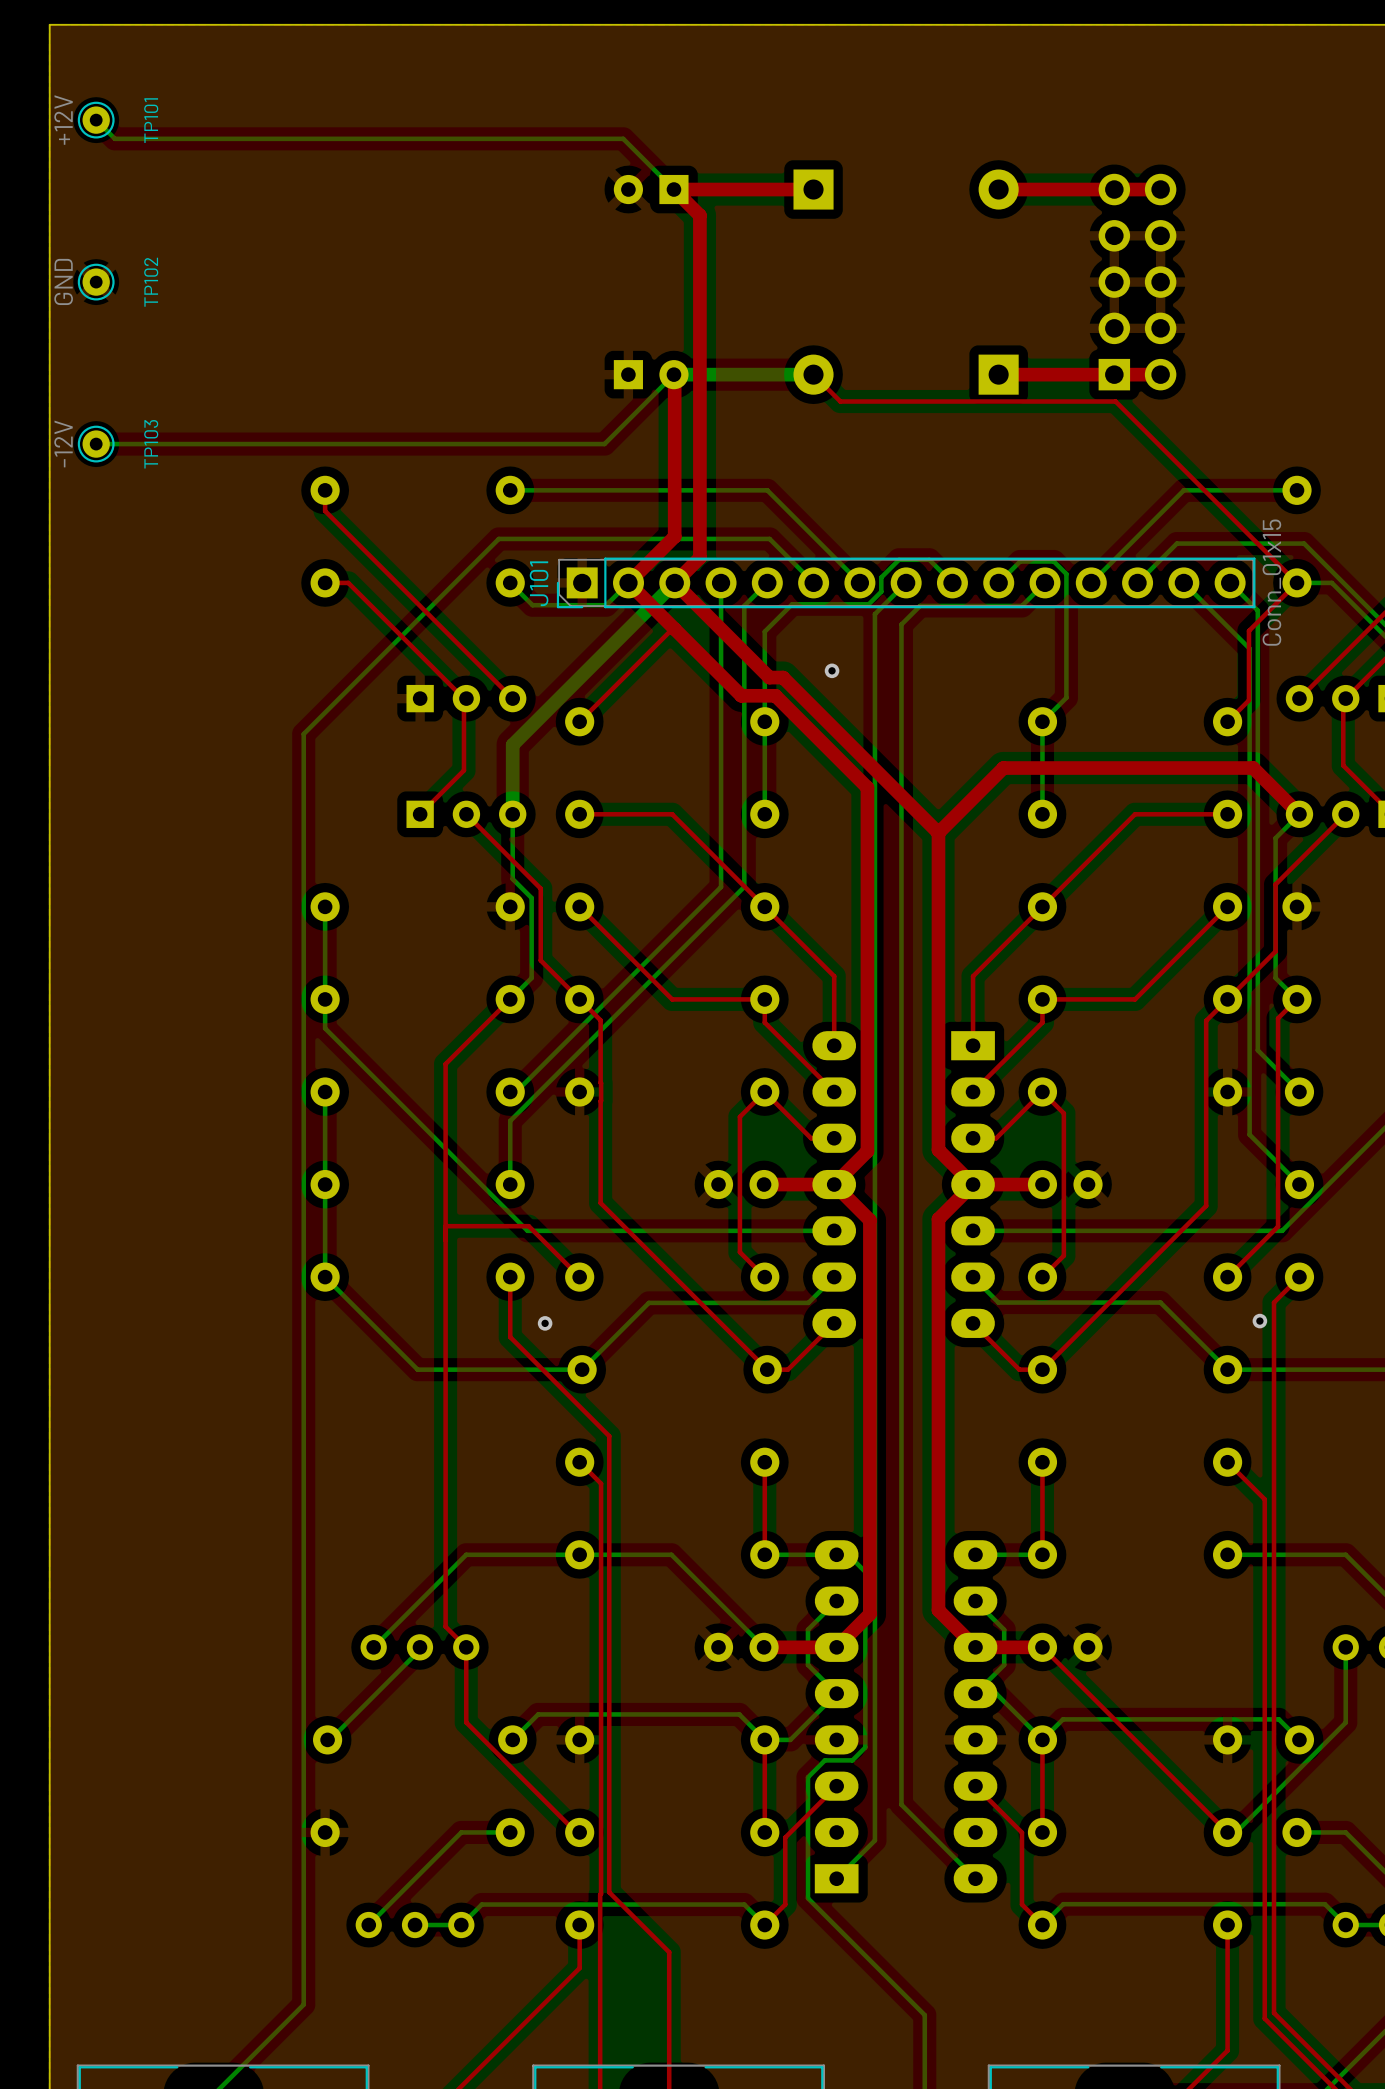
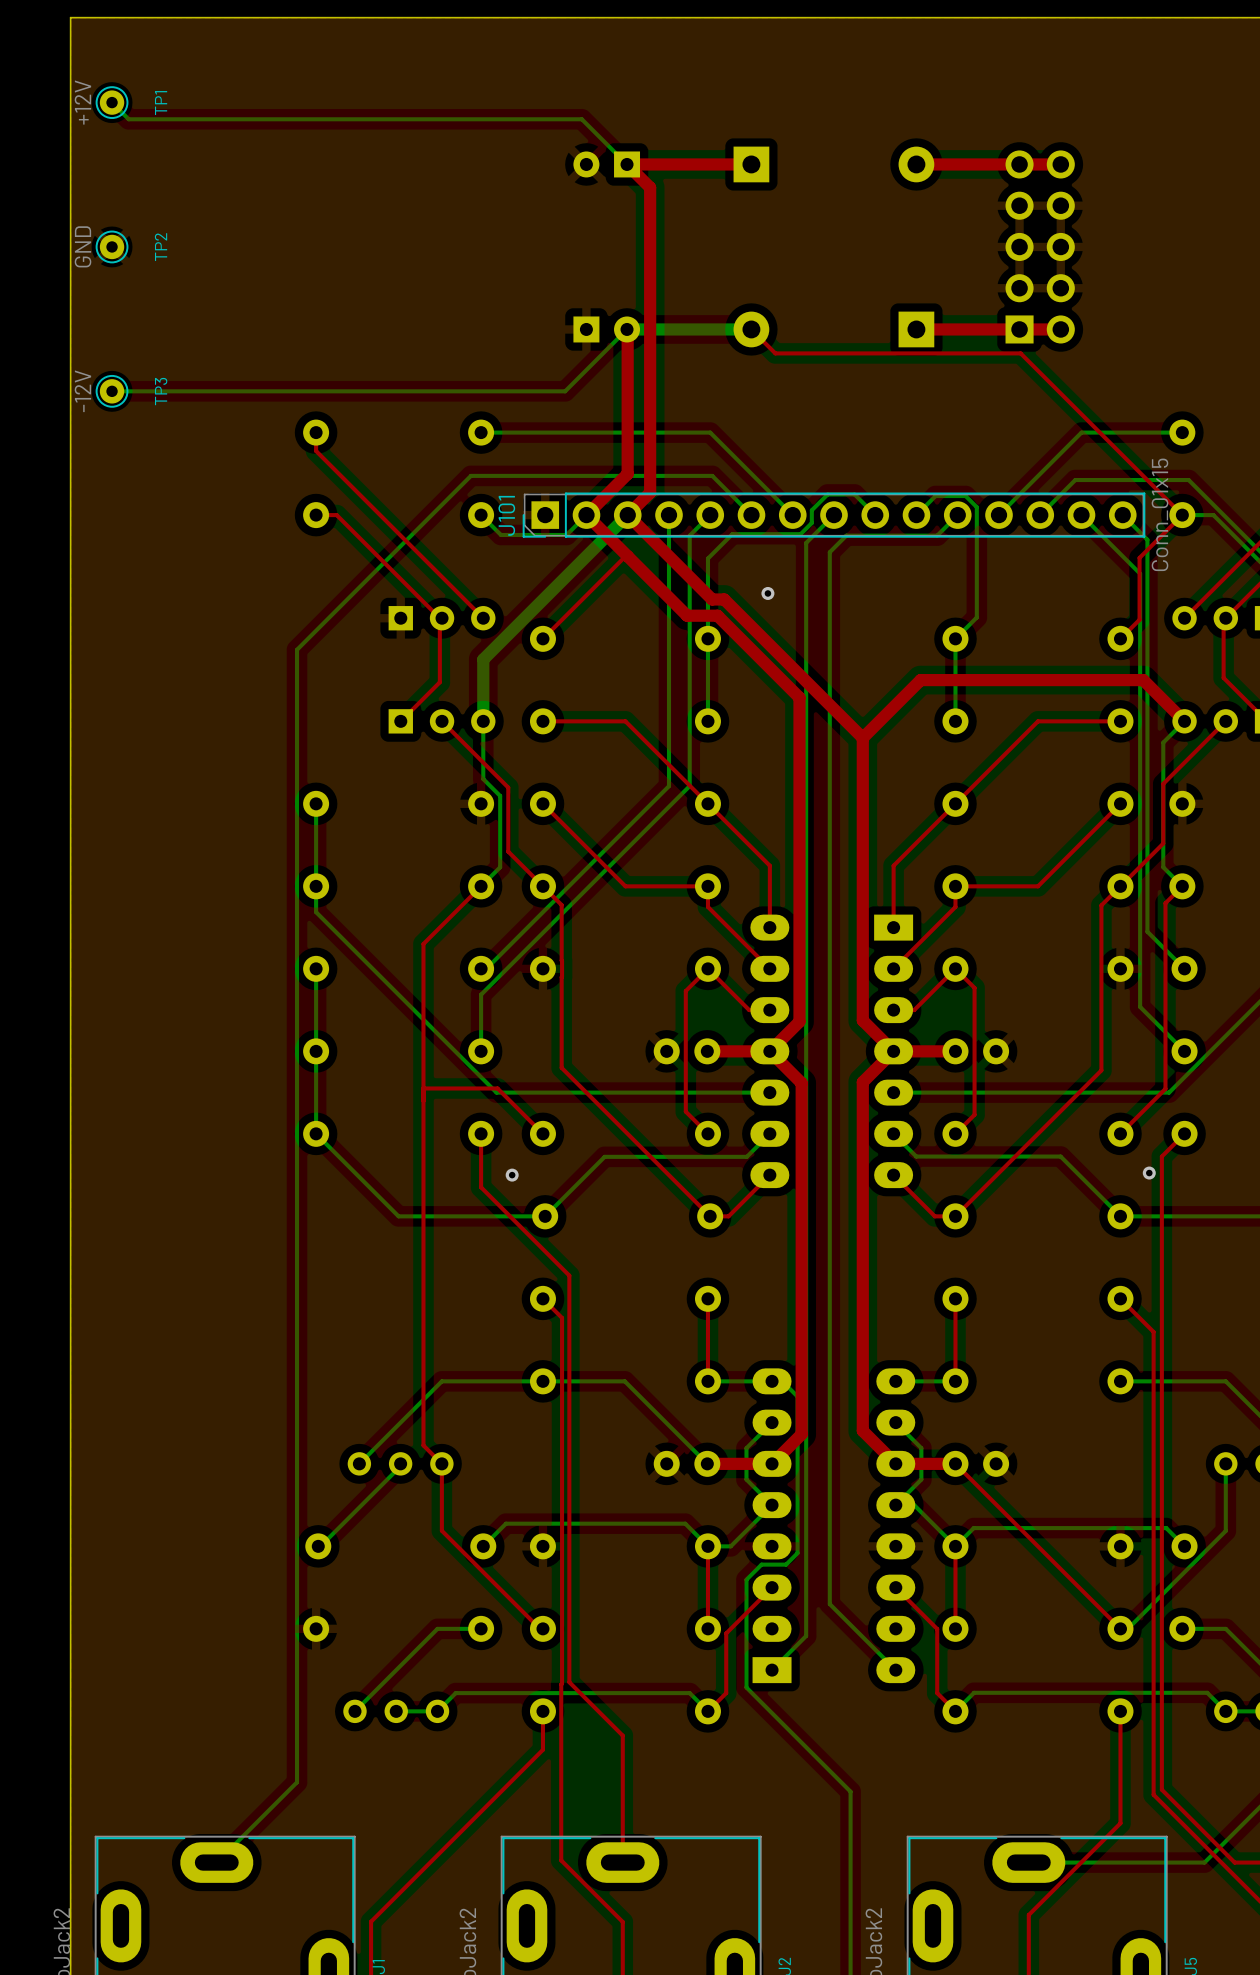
TP101 name: TP101 (151, 120) -> TP1 (161, 103)
TP102 name: TP102 (151, 282) -> TP2 (161, 247)
TP103 name: TP103 (151, 444) -> TP3 (161, 391)

